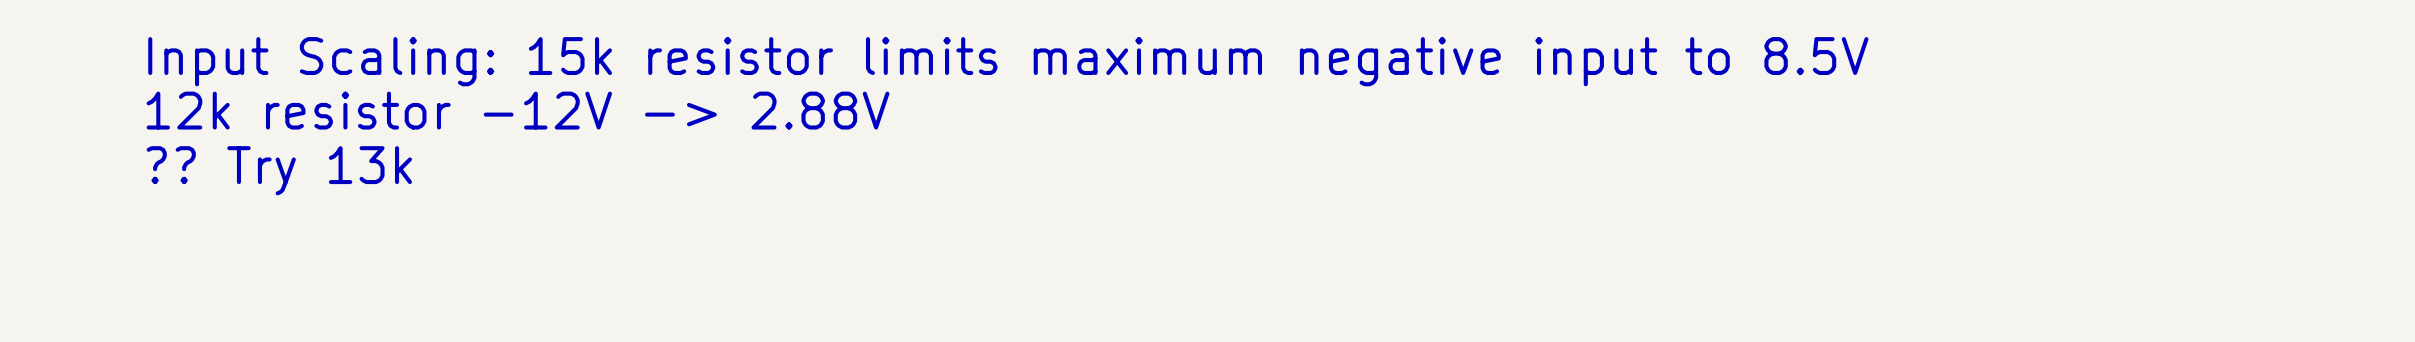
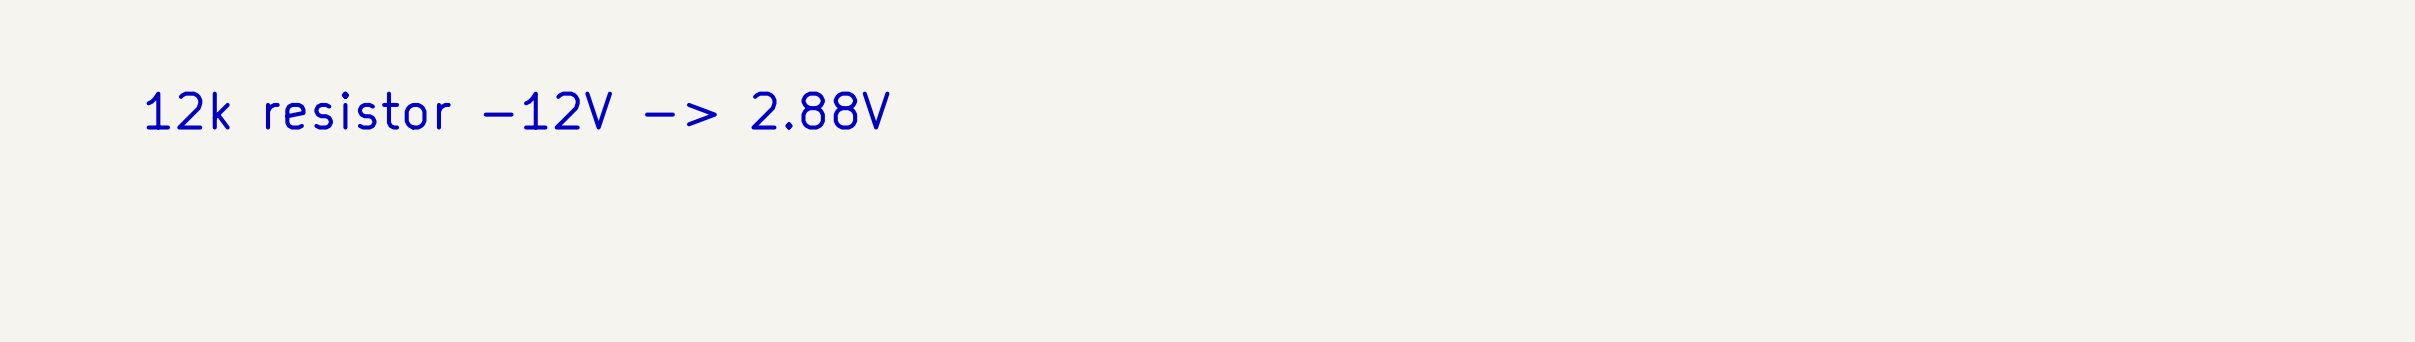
text: Input Scaling: 15k resistor limits maximum negative input to 8.5V (1008, 61) -> none
text: ?? Try 13k (279, 170) -> none

